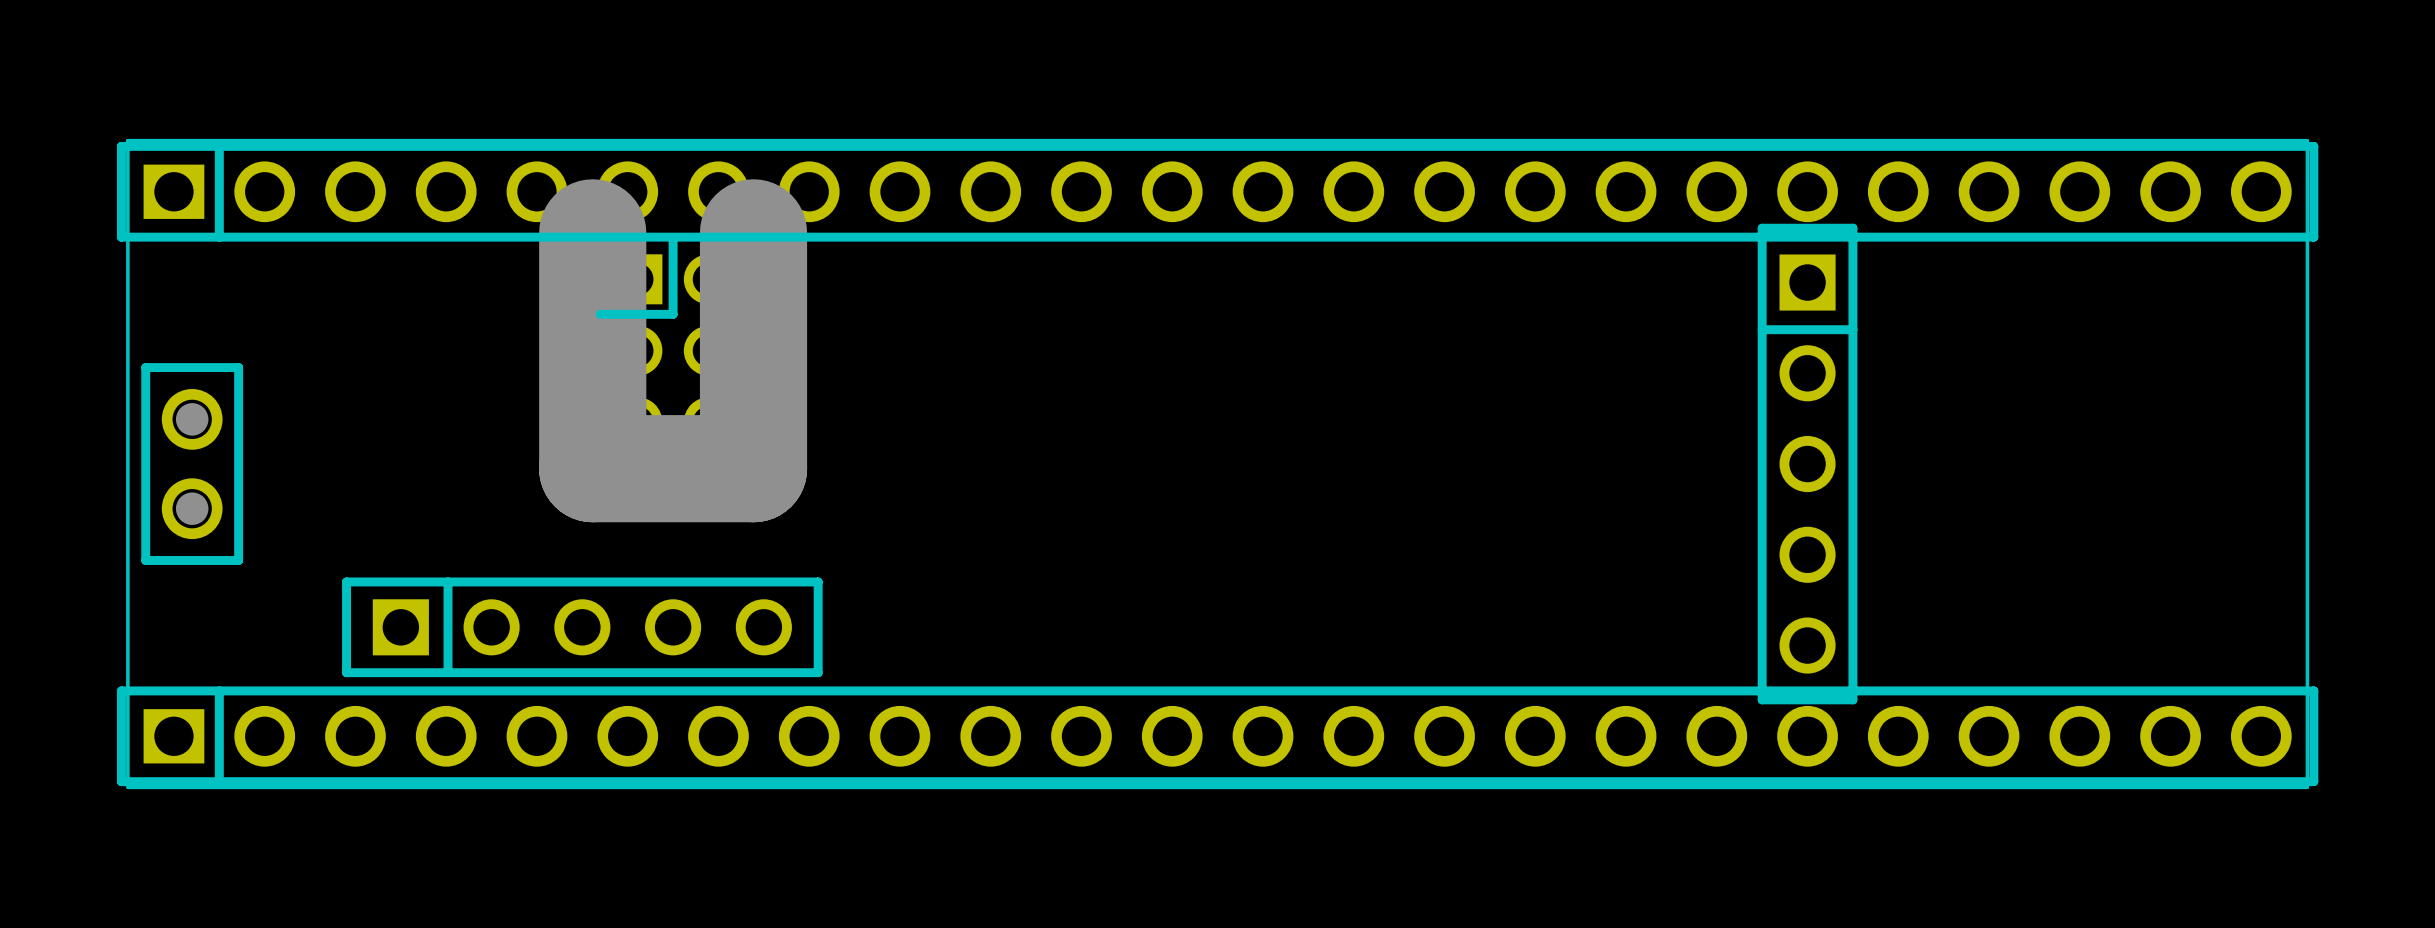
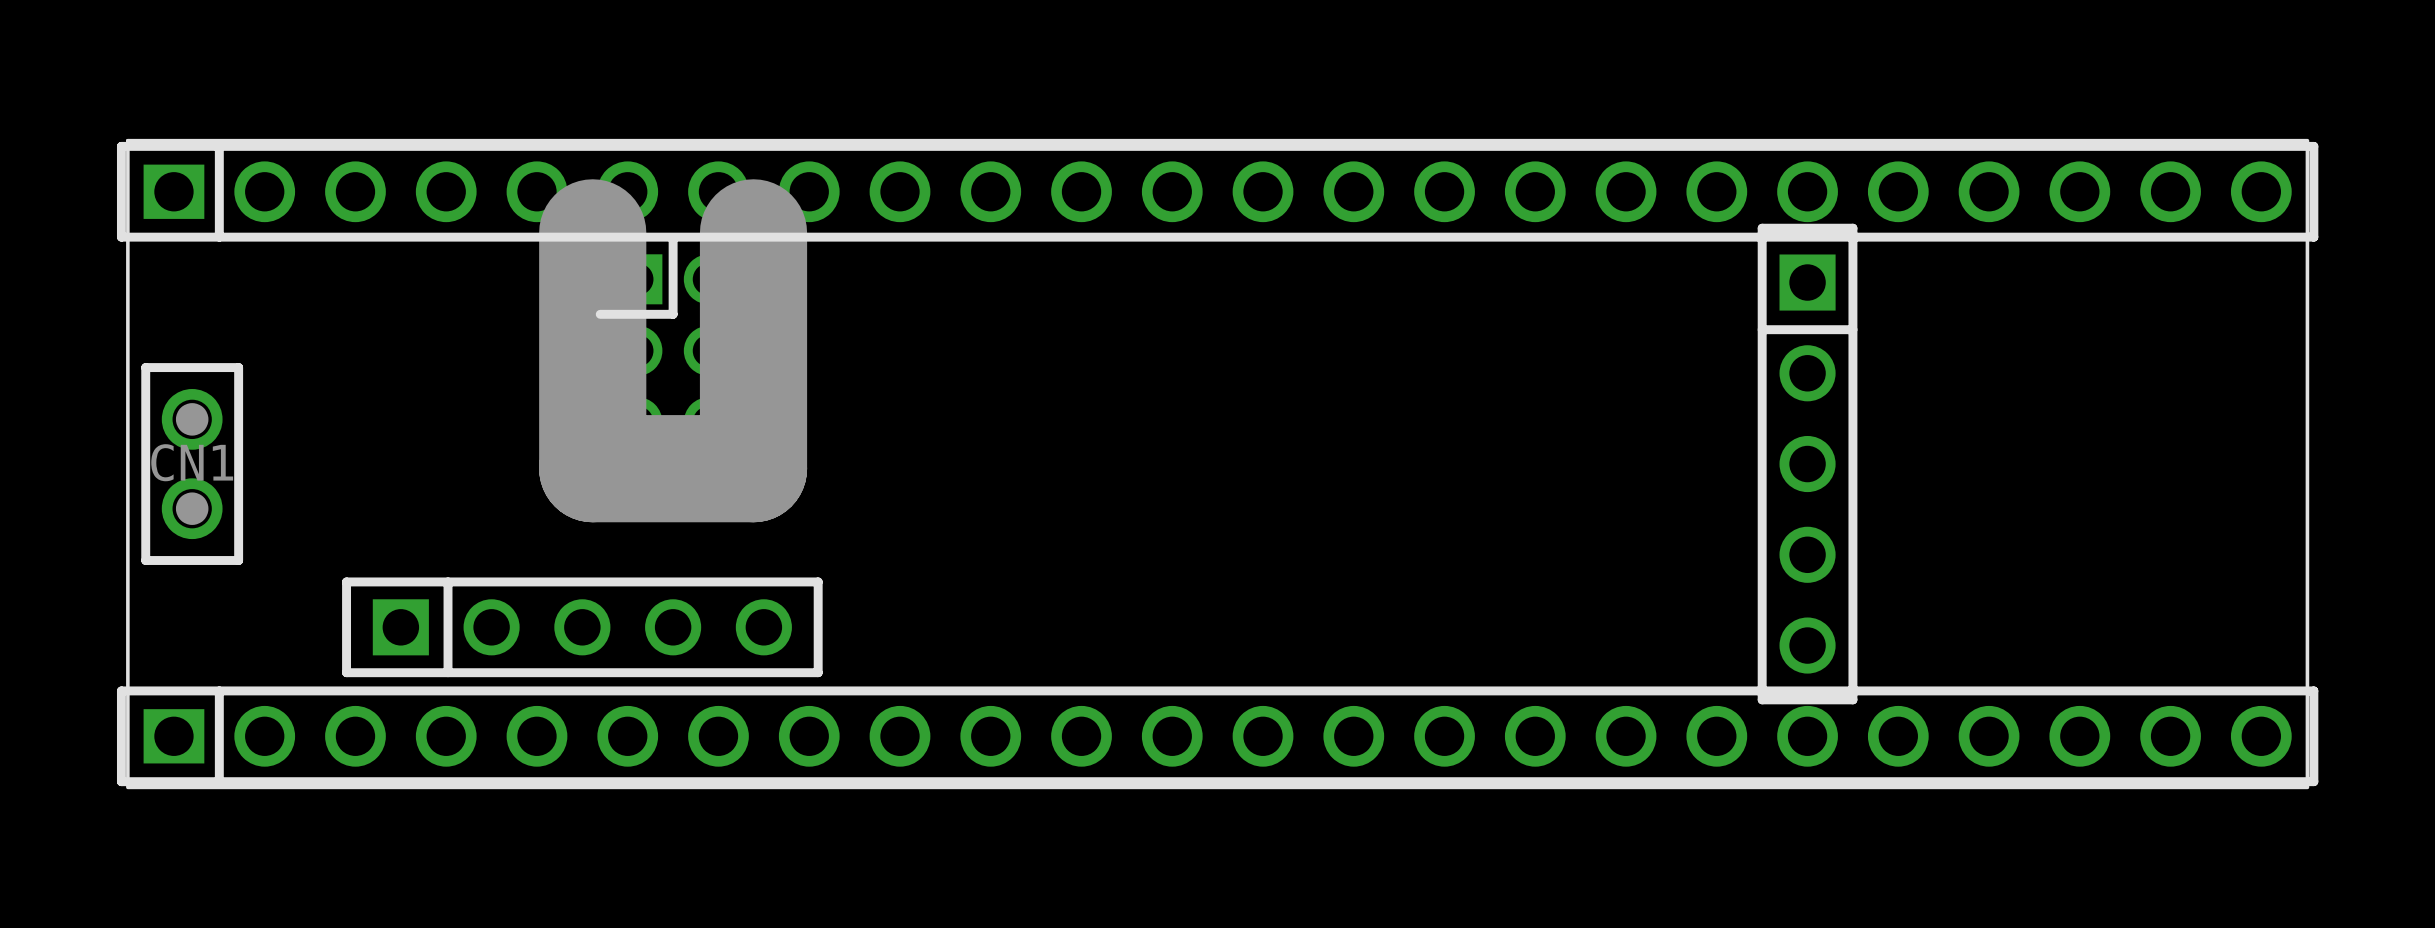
CN1 name: none -> CN1 (192, 462)

